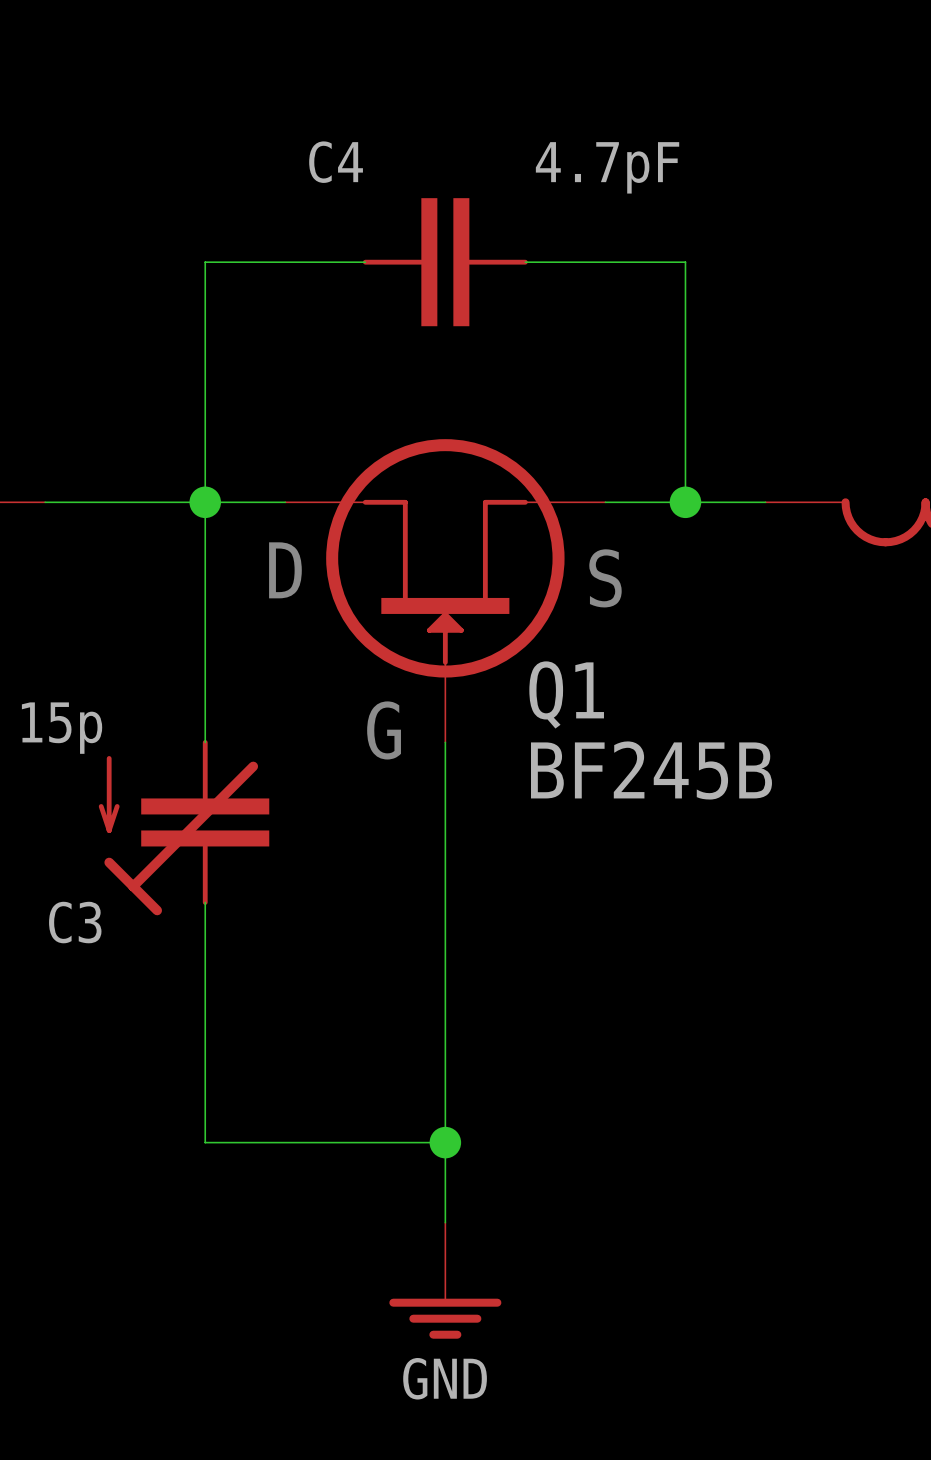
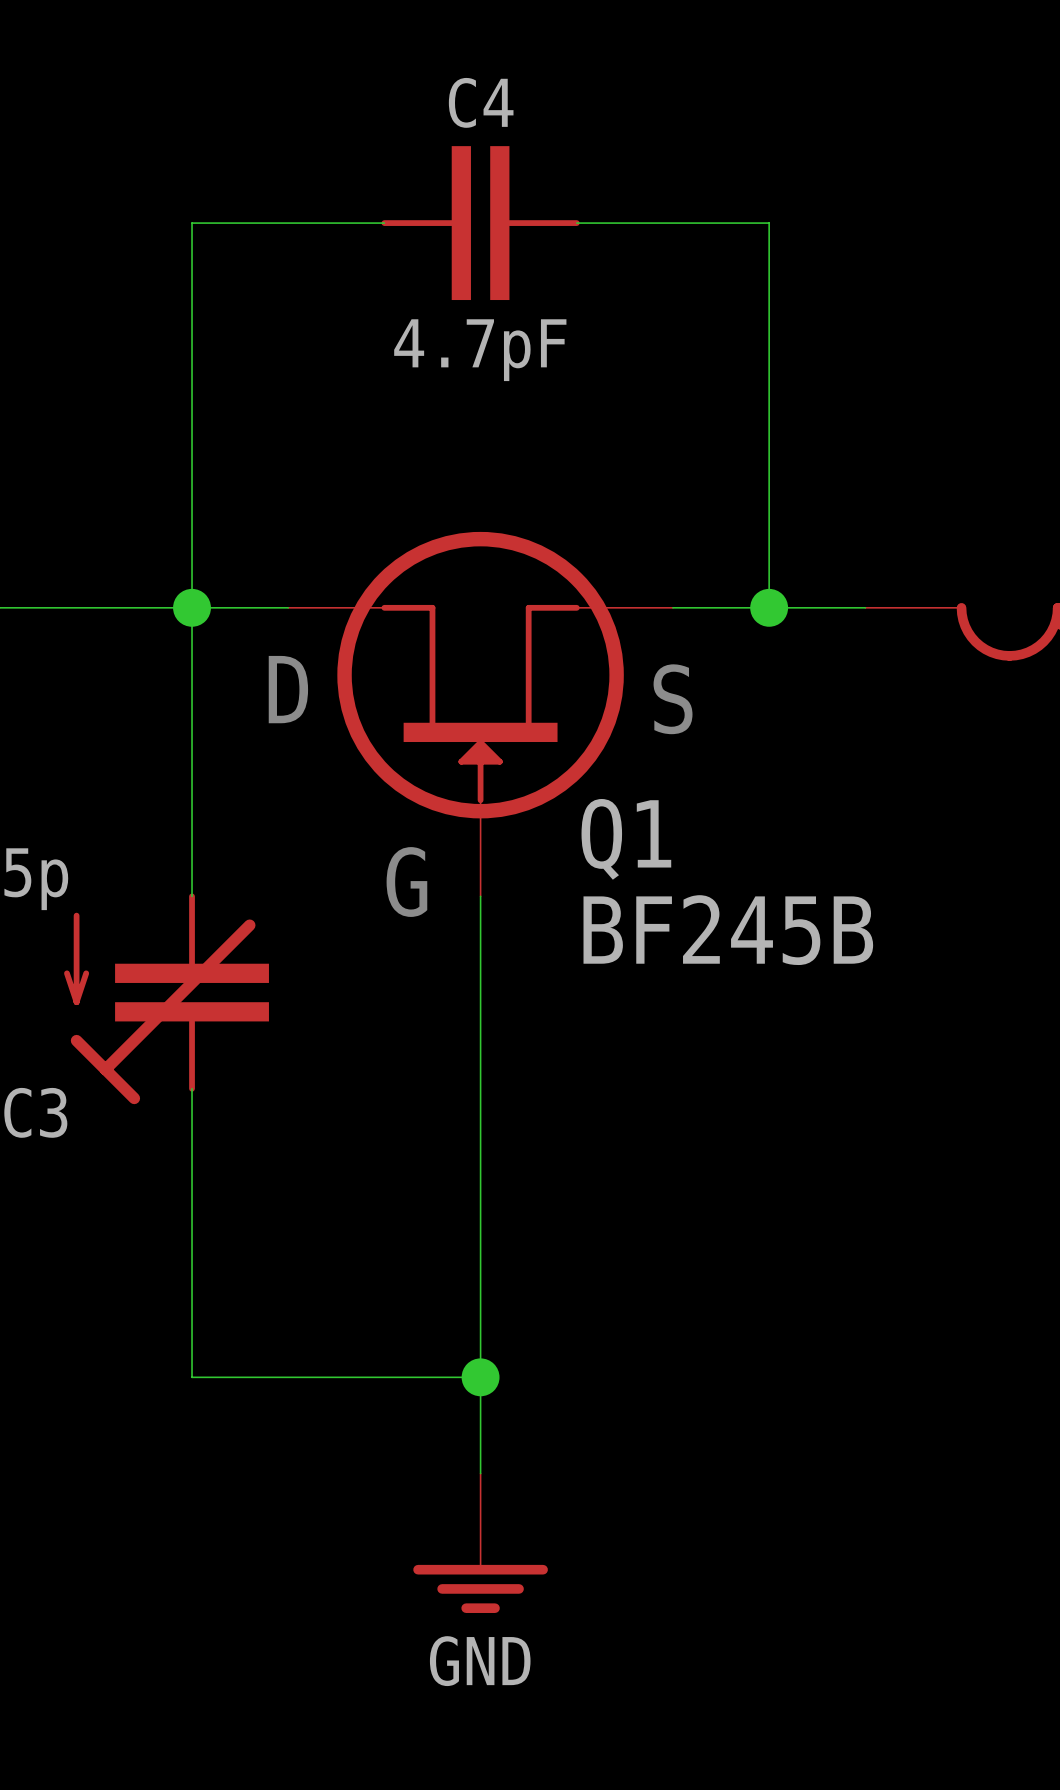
C4 name position: C4 (336, 162) -> C4 (481, 102)
C4 value position: 4.7pF (607, 167) -> 4.7pF (480, 350)
wire: (205, 262) (365, 262) -> (192, 319) (192, 223) (384, 223)
C4 position: (445, 262) -> (480, 223)
wire: (525, 262) (685, 262) -> (576, 223) (769, 223) (769, 319)

